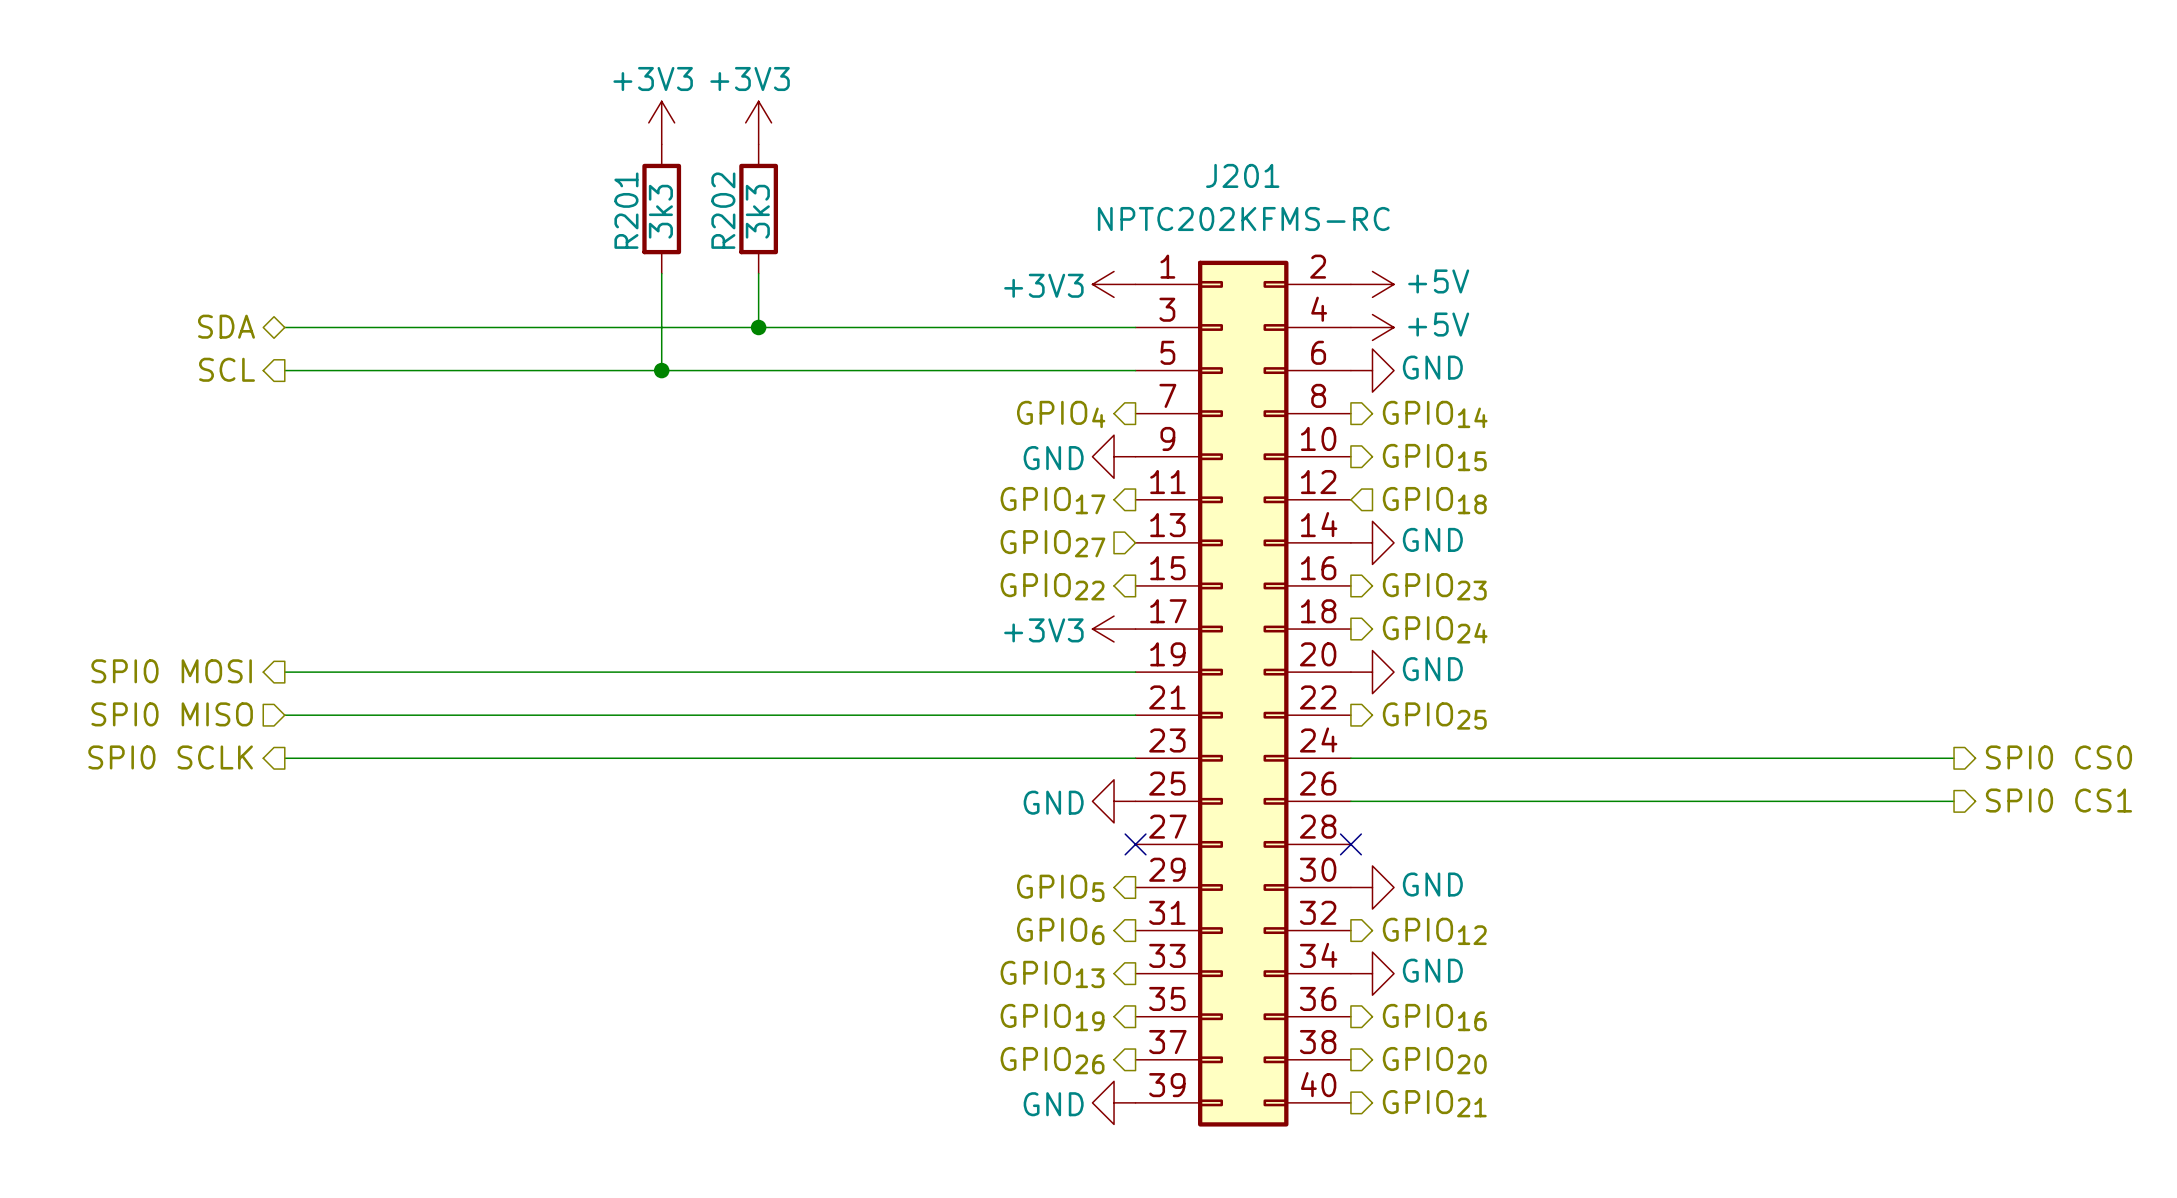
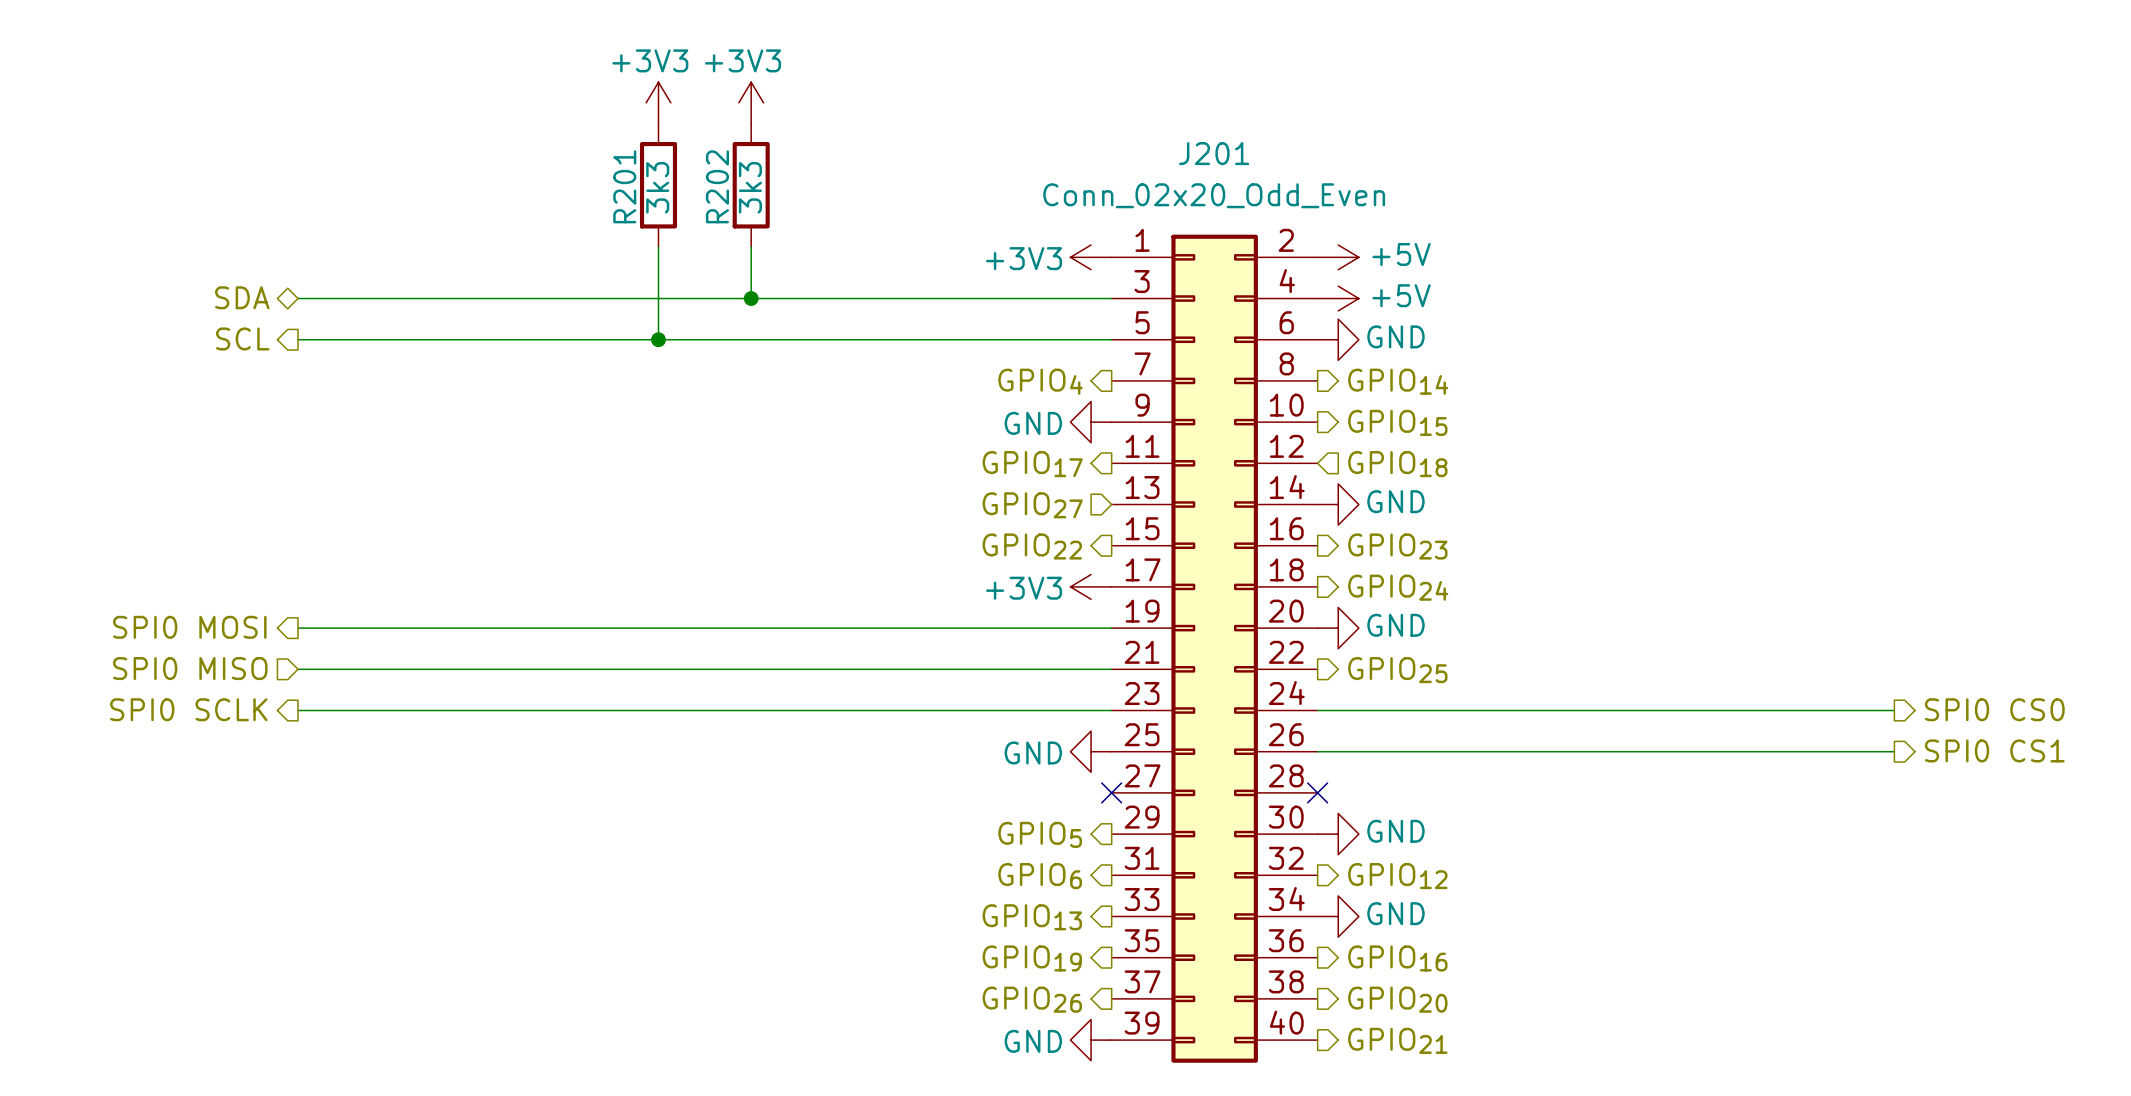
J201 value: NPTC202KFMS-RC (1243, 218) -> Conn_02x20_Odd_Even (1214, 195)

